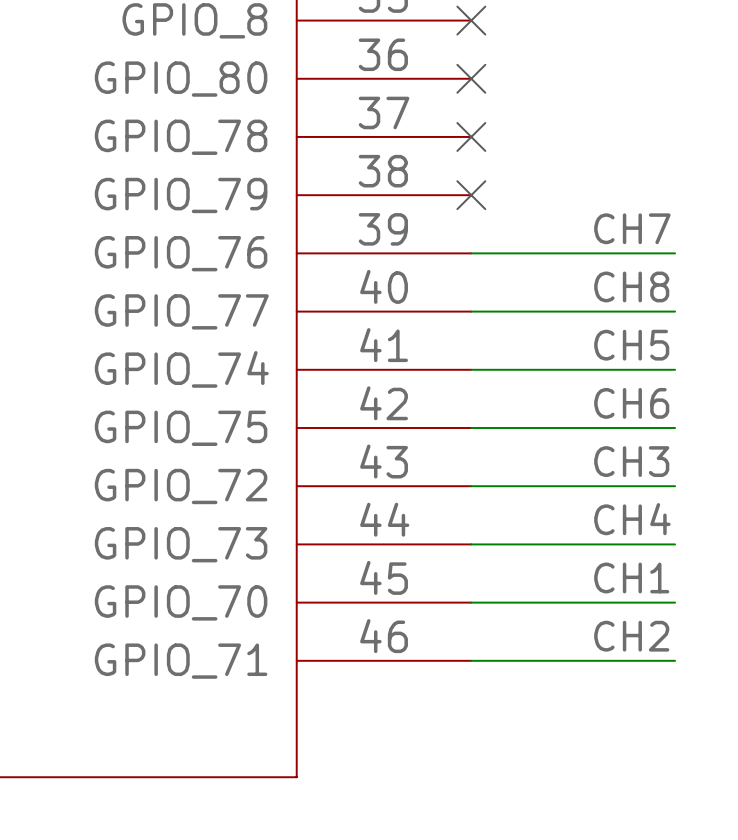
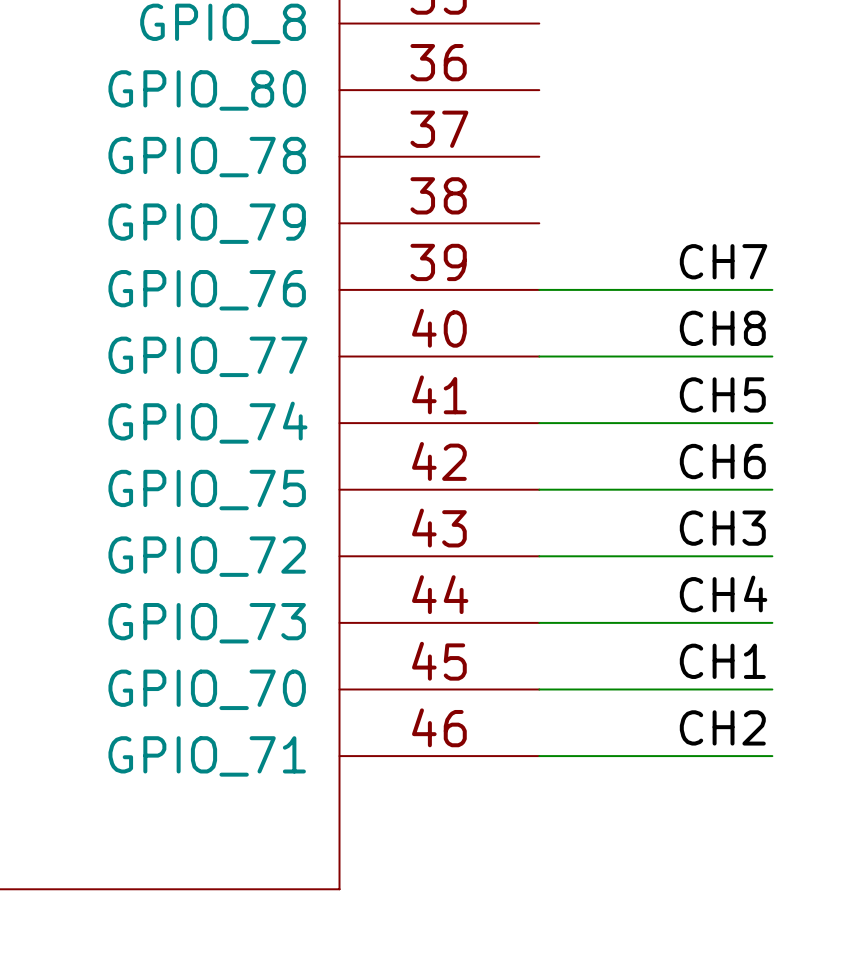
no-connect mark: (471, 20) -> none
no-connect mark: (471, 78) -> none
no-connect mark: (471, 136) -> none
no-connect mark: (471, 195) -> none

